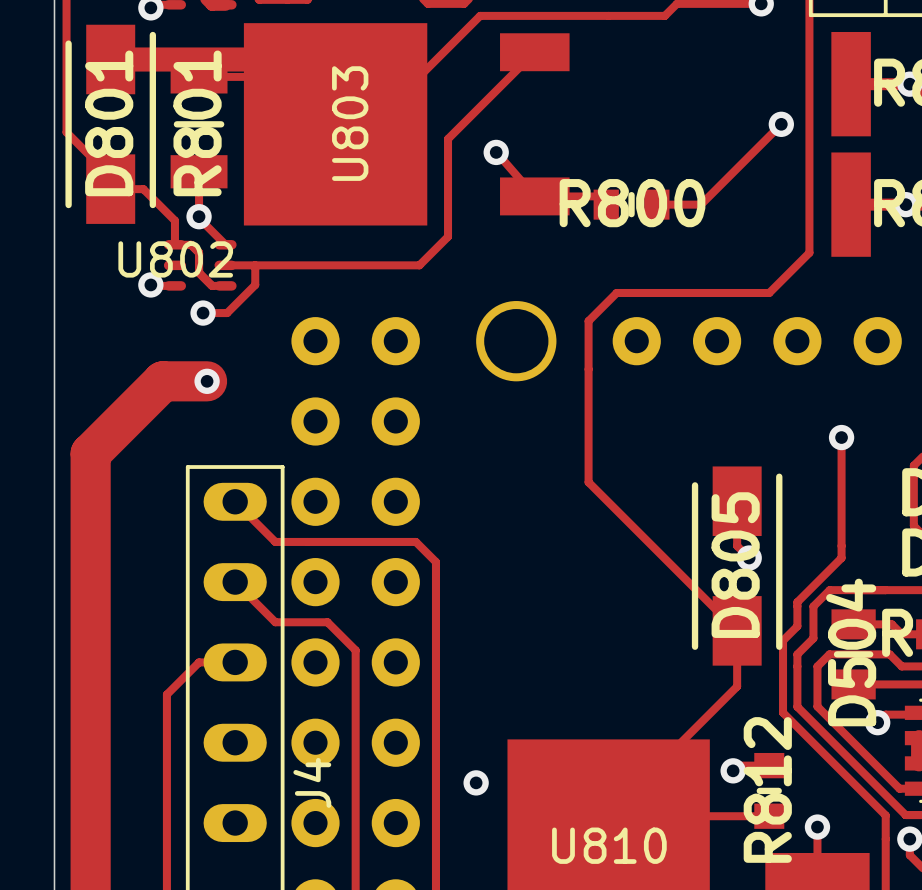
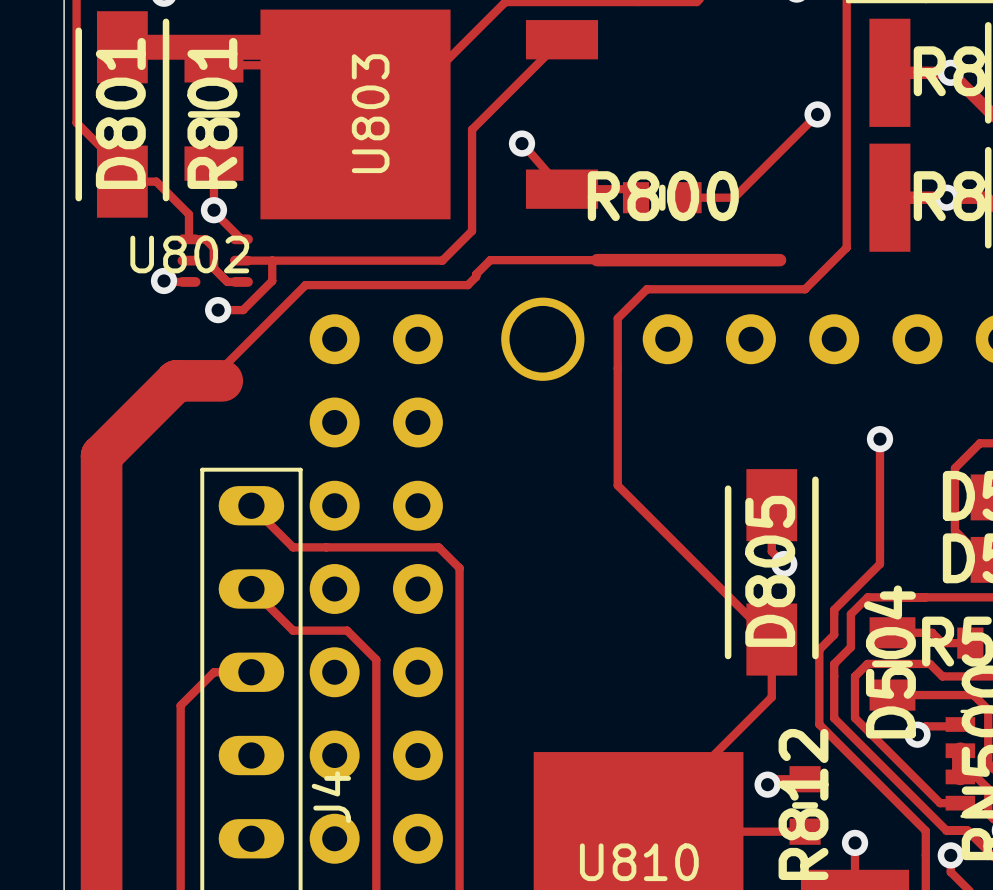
track: none -> (780, 260) (490, 260) (467, 285) (305, 285) (218, 372)
via: (207, 381) -> none
via: (476, 782) -> none

